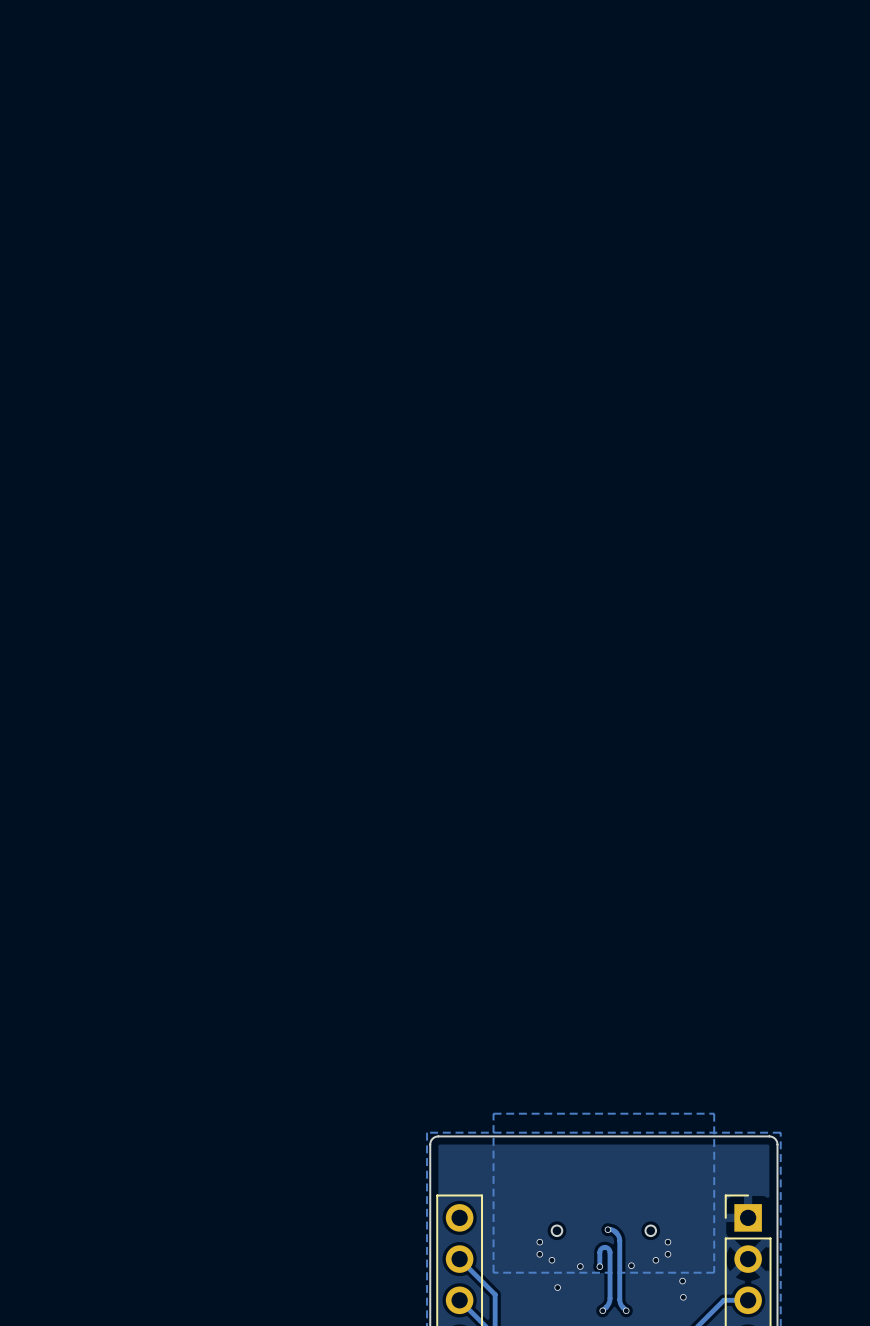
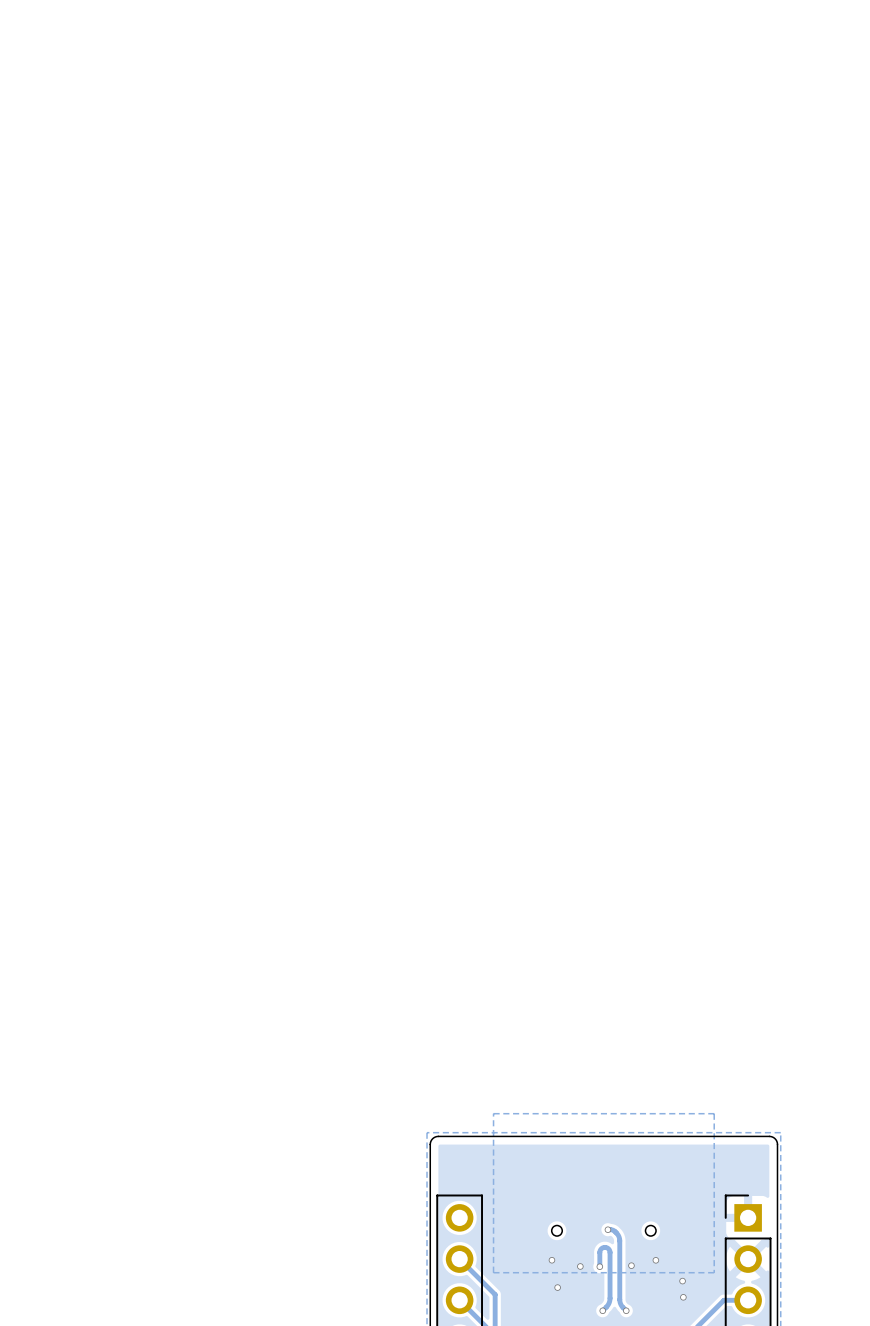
via: (539, 1242) -> none
via: (667, 1242) -> none
via: (539, 1254) -> none
via: (667, 1254) -> none

